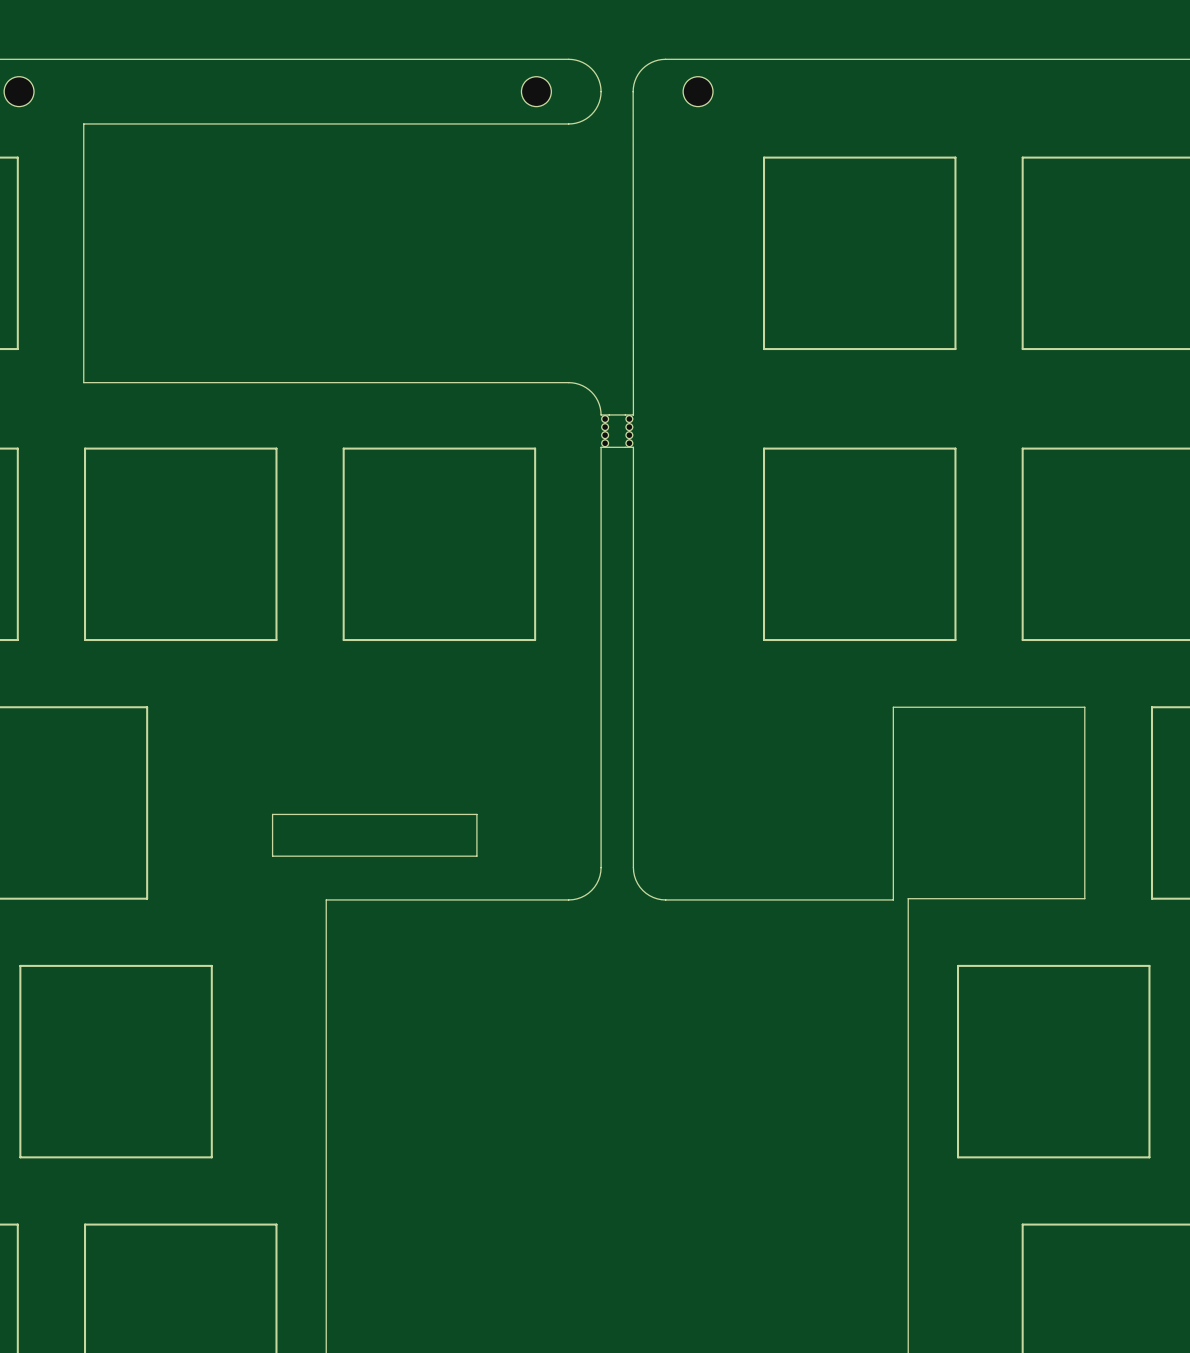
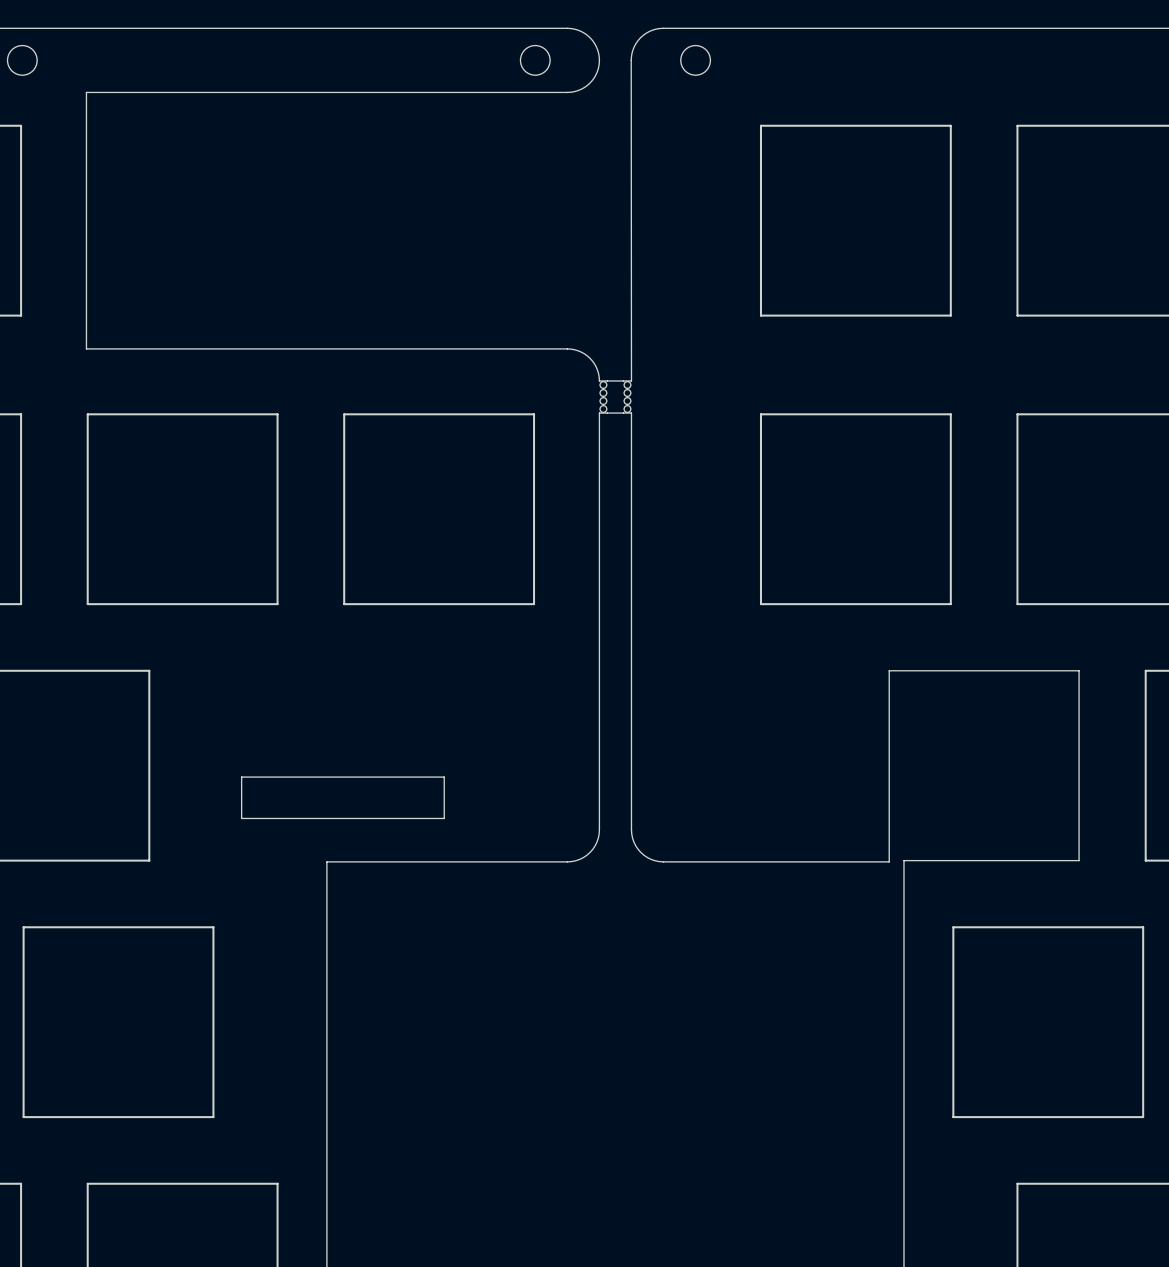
drawing position: (374, 835) -> (342, 797)

